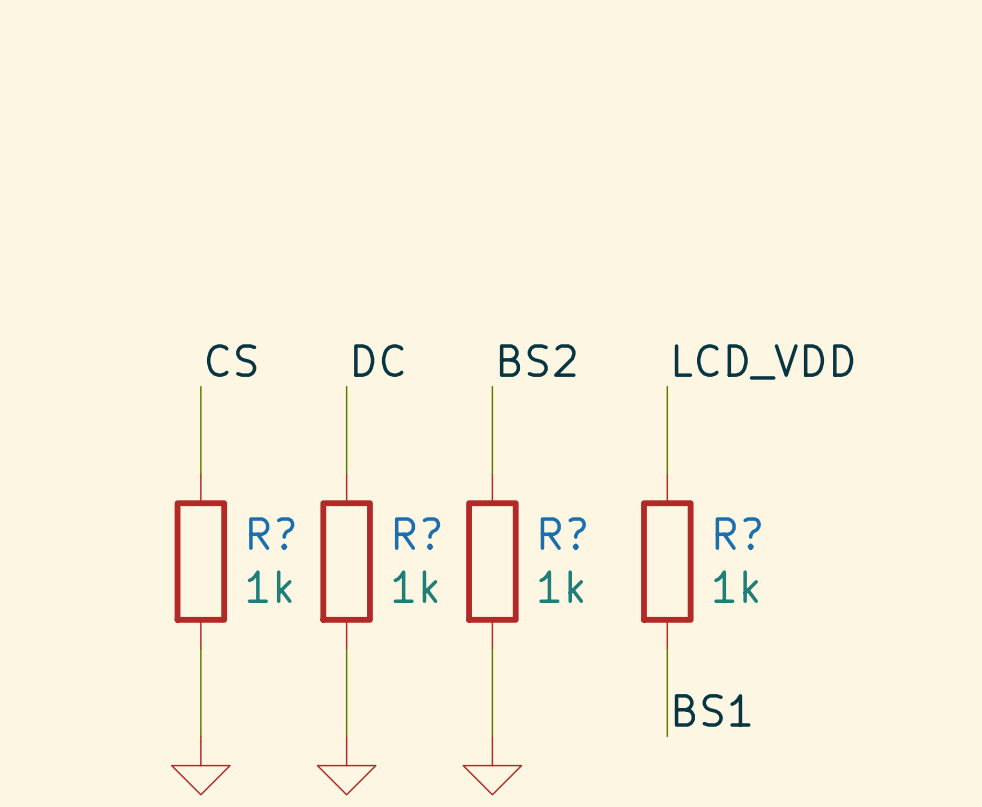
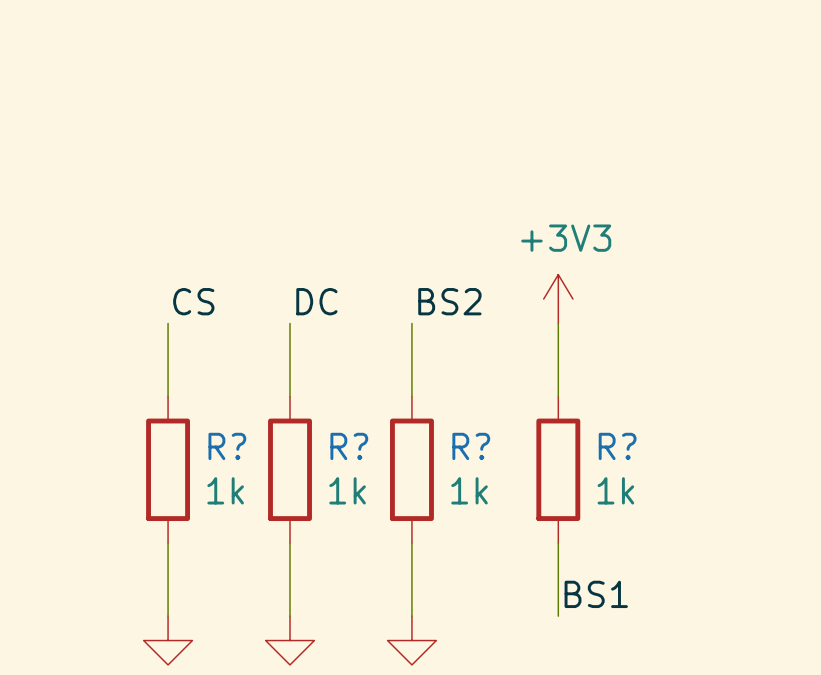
power symbol: none -> +3V3 (558, 299)
label: LCD_VDD (764, 361) -> none

